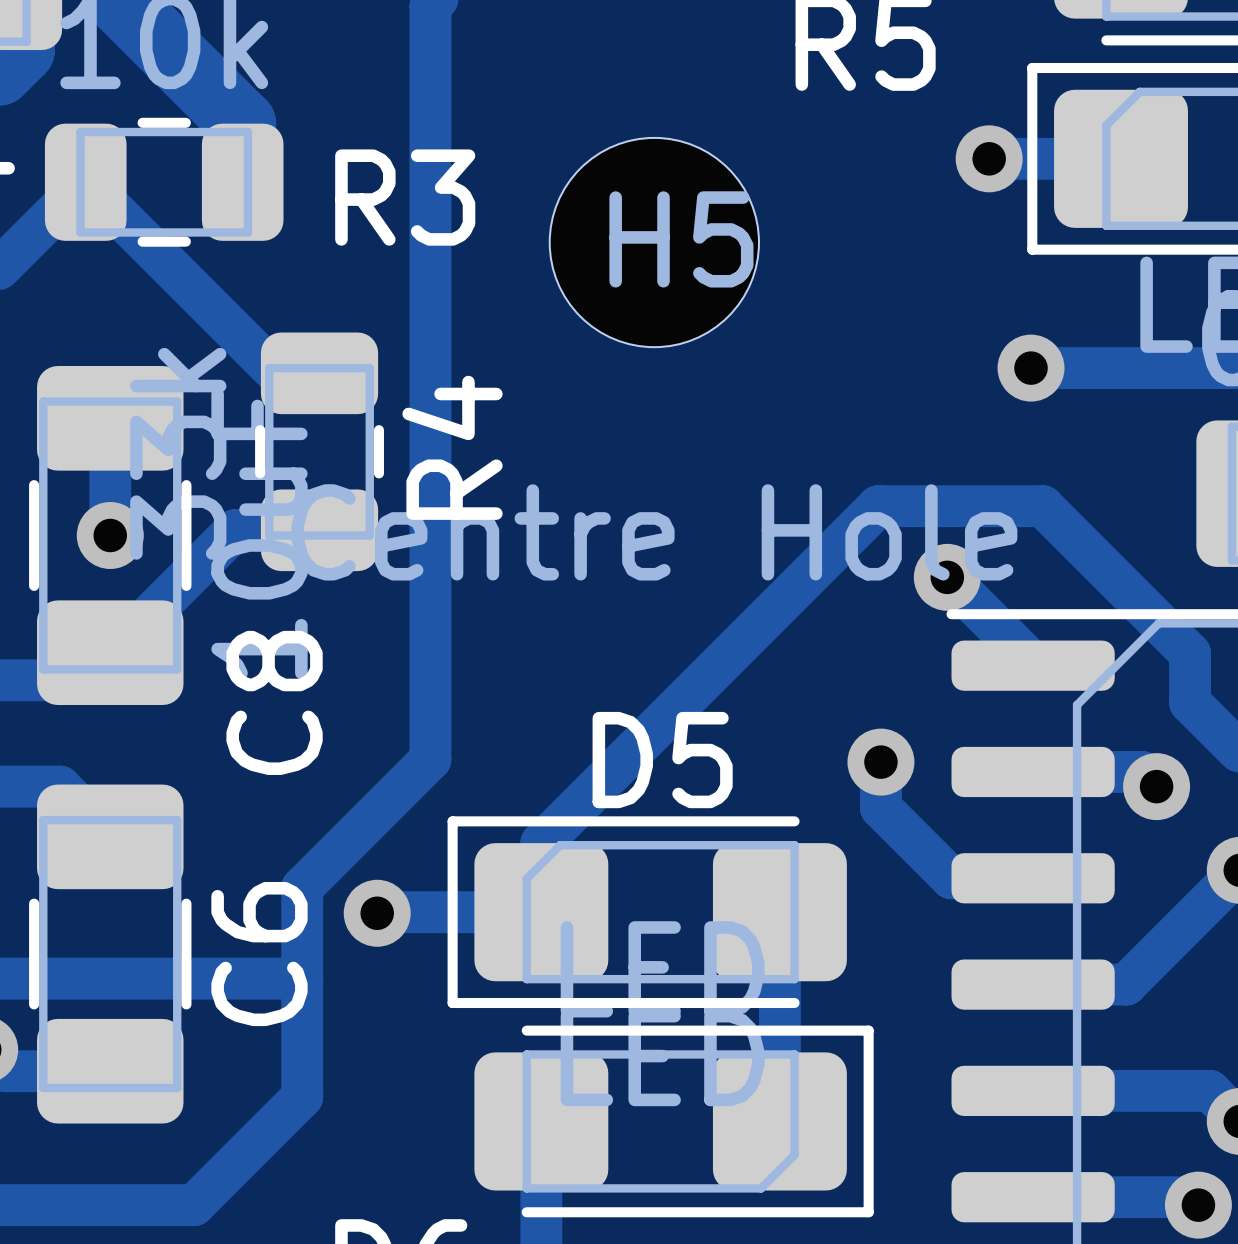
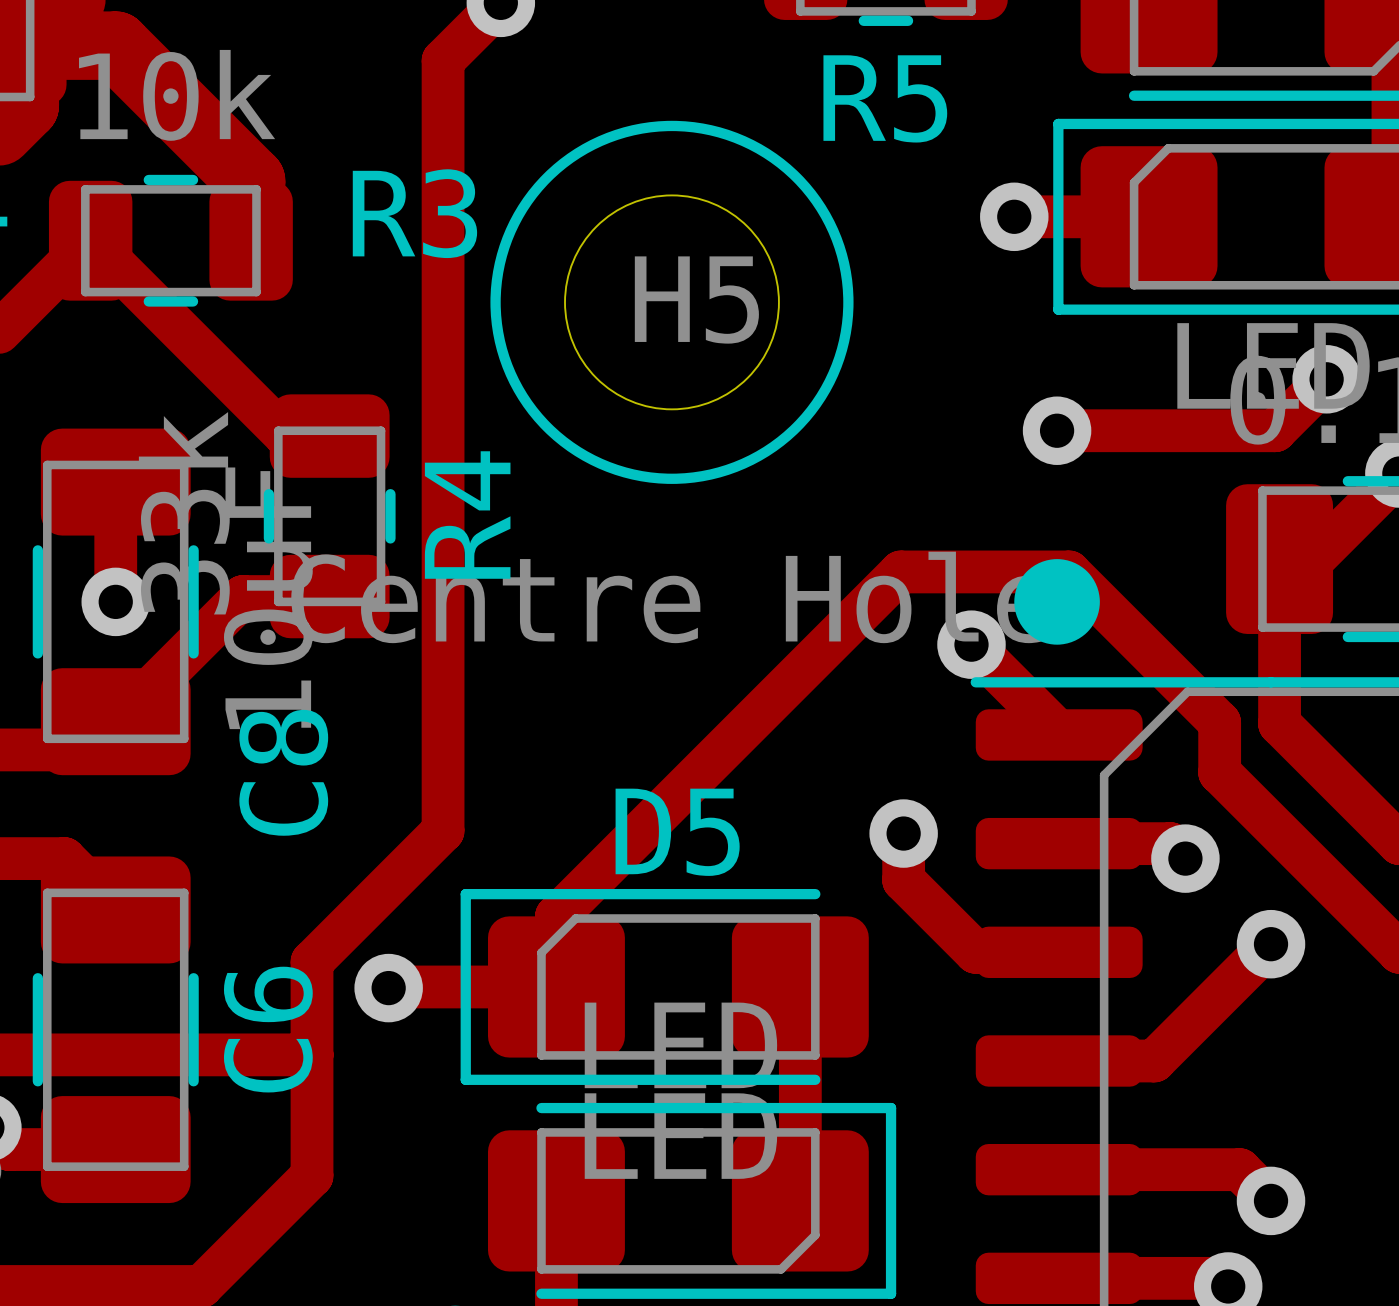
drawing: none -> [490, 120, 854, 484]
R3 name position: R3 (405, 197) -> R3 (414, 213)
drawing: none -> [1014, 559, 1100, 645]

